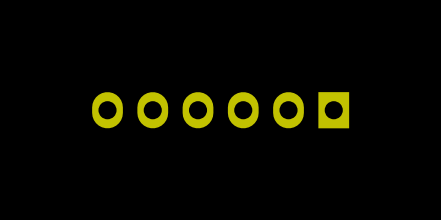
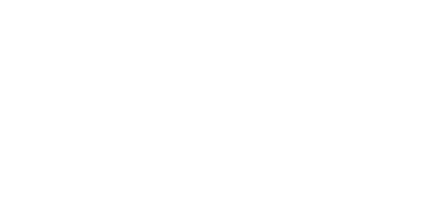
part: (220, 110) -> none

